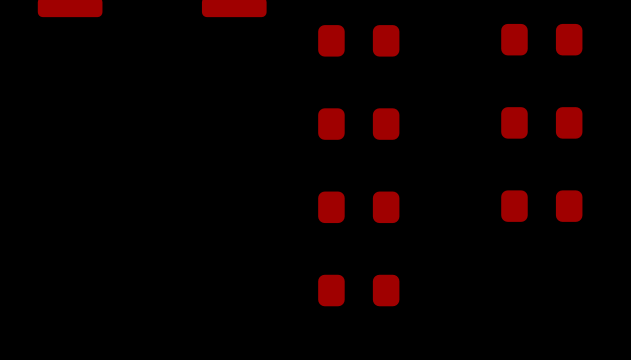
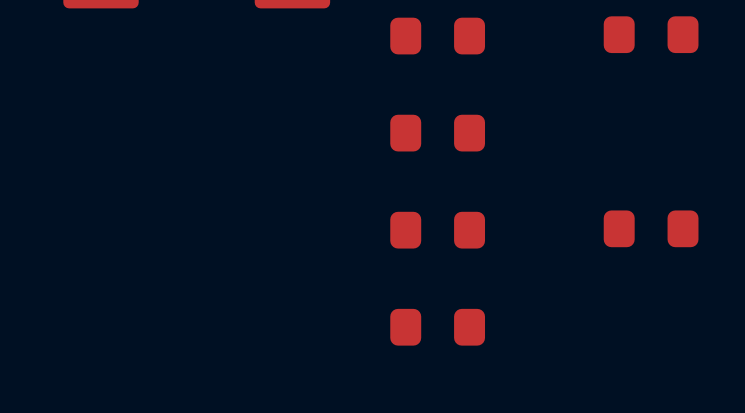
part: (541, 122) -> none

